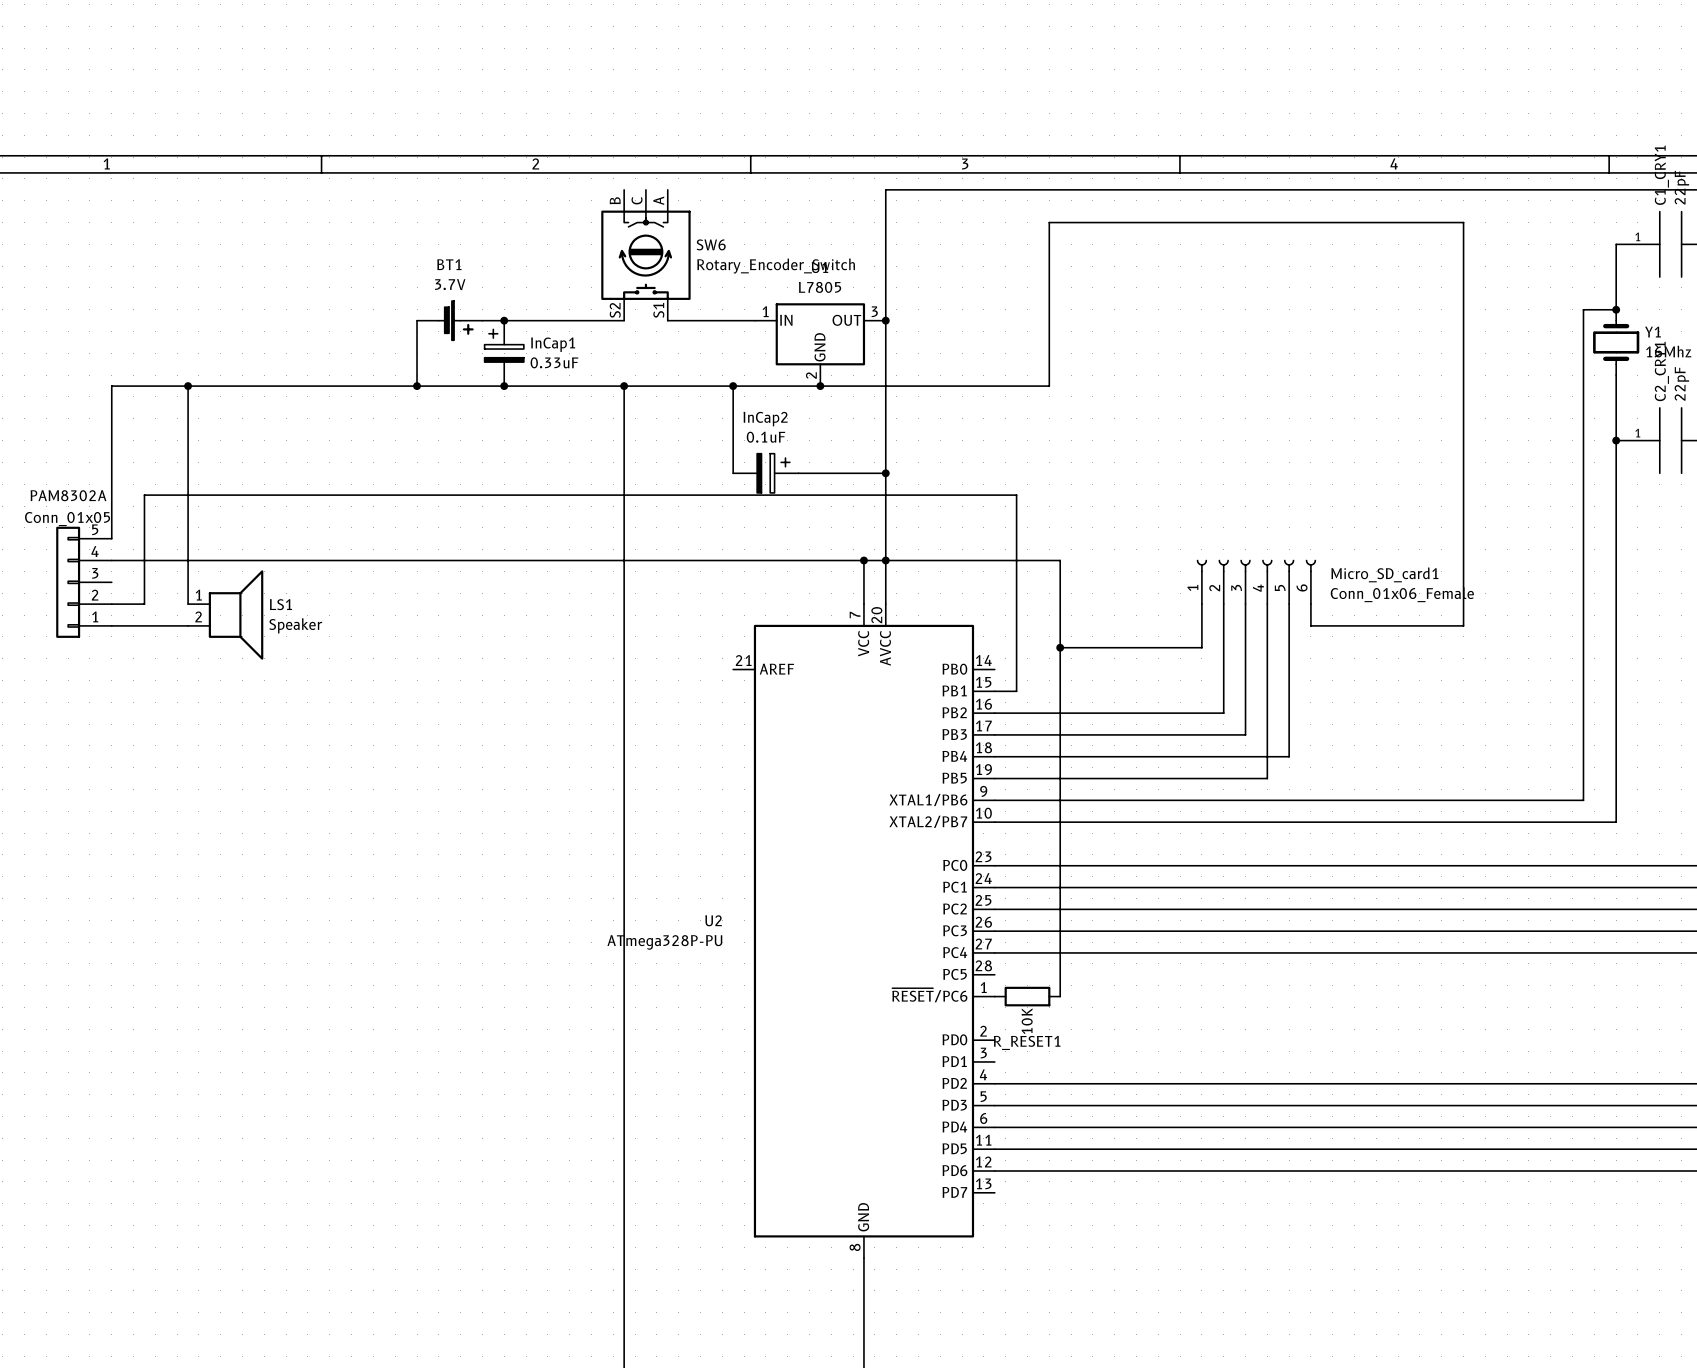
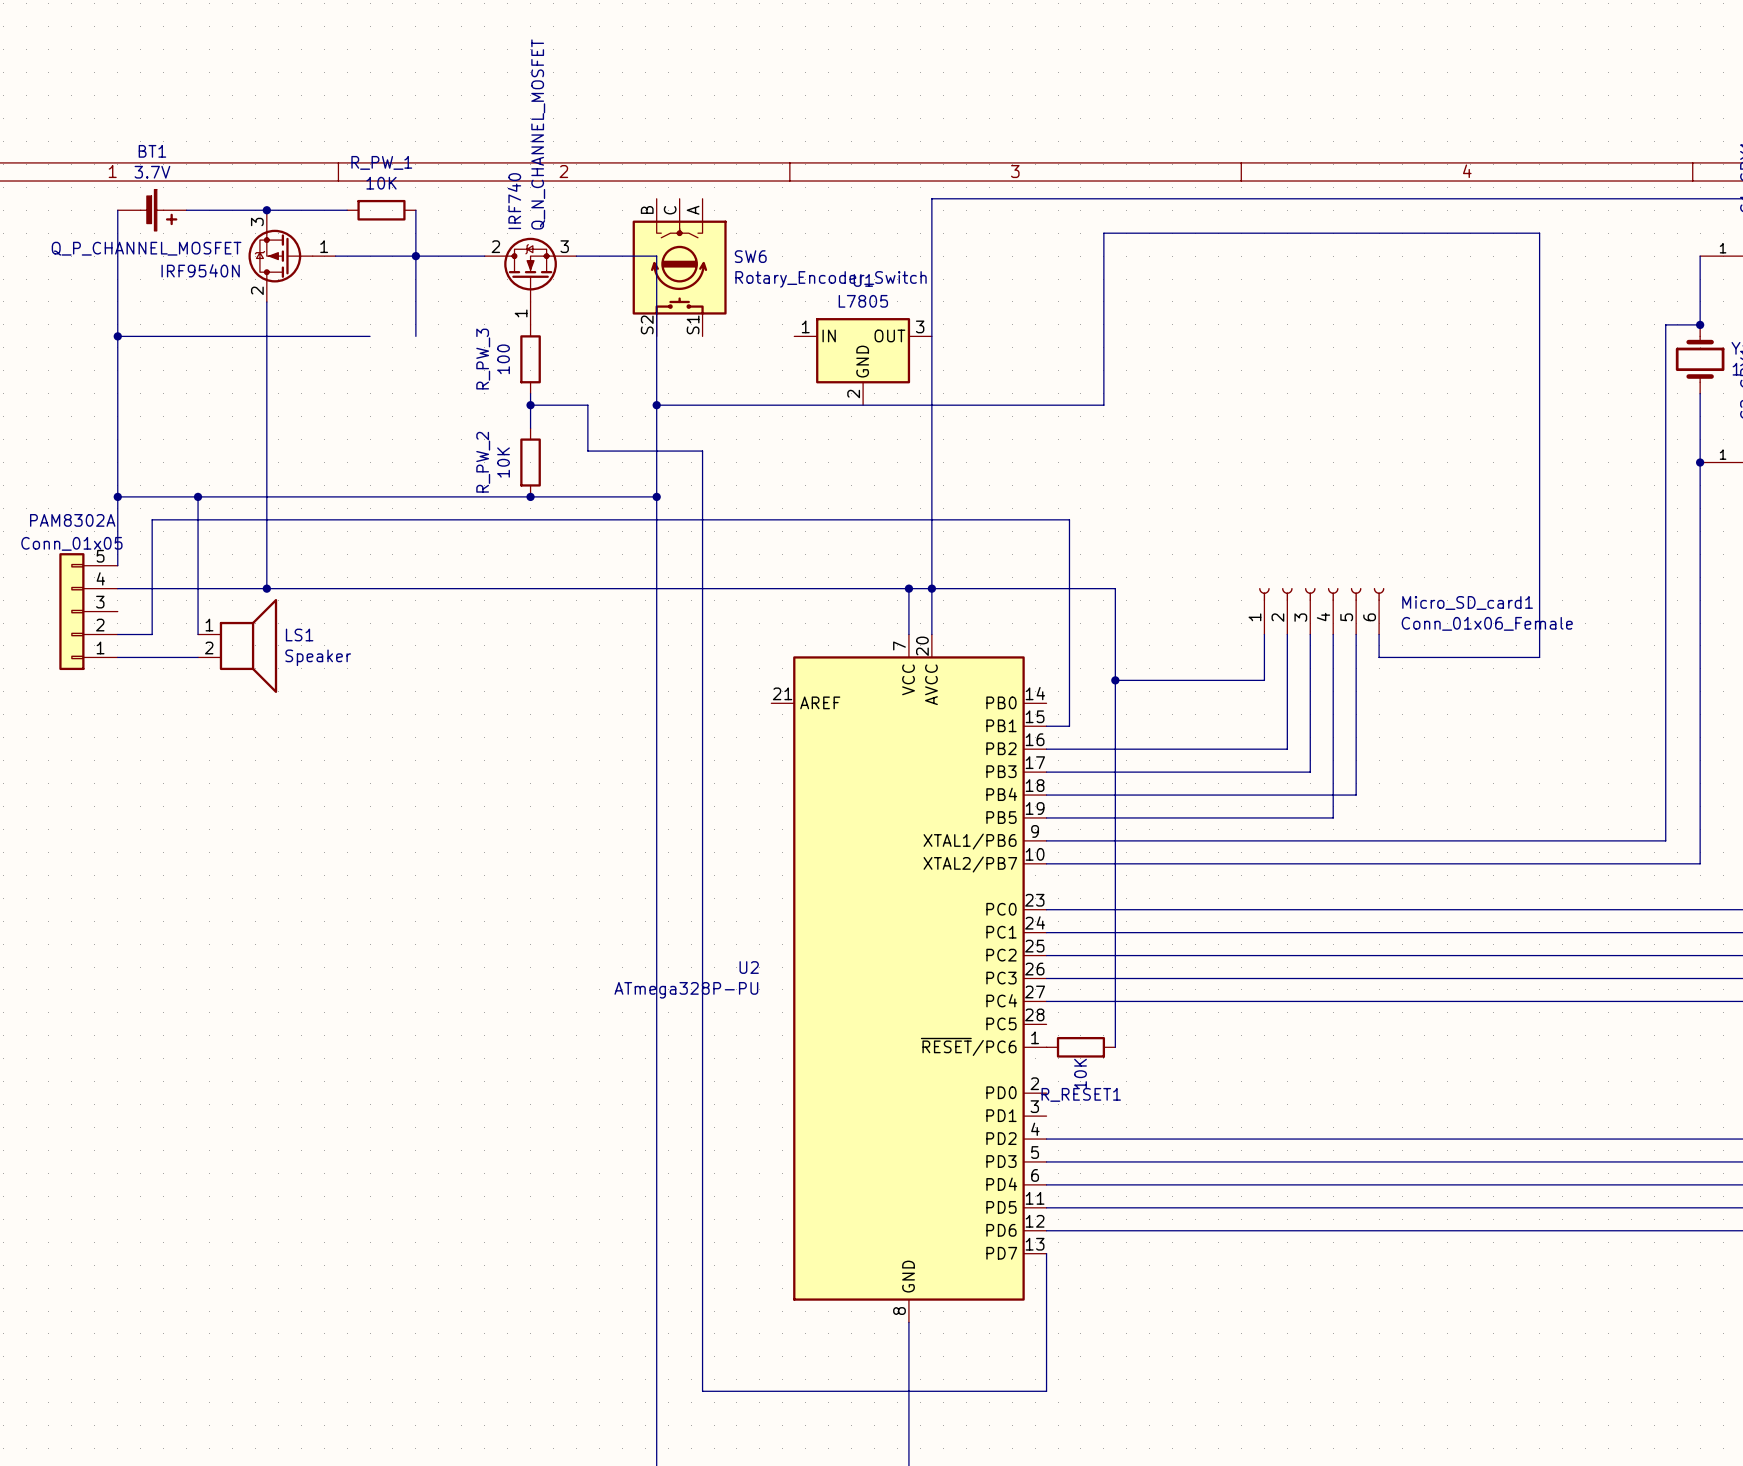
wire: none -> (186, 210) (347, 210)
junction: none -> (266, 210)
R_PW_1: none -> 10K (381, 210)
wire: none -> (415, 210) (415, 336)
Q_P_CHANNEL_MOSFET: none -> IRF9540N (292, 256)
junction: none -> (415, 256)
Q_N_CHANNEL_MOSFET: none -> IRF740 (530, 281)
wire: none -> (266, 301) (266, 588)
wire: none -> (117, 336) (370, 336)
junction: none -> (117, 336)
wire: (417, 320) (417, 386) -> none
BT1 position: (449, 320) -> (152, 210)
wire: (482, 320) (624, 320) -> (335, 256) (484, 256)
junction: (504, 320) -> none
wire: (667, 320) (754, 320) -> none
junction: (885, 320) -> none
R_PW_3: none -> 100 (530, 359)
InCap1: 0.33uF (504, 353) -> none
wire: none -> (530, 393) (530, 428)
wire: (111, 386) (504, 386) -> (117, 405) (117, 210)
wire: (188, 386) (188, 473) -> none
junction: (188, 386) -> none
junction: (417, 386) -> none
wire: (558, 386) (624, 386) -> (576, 256) (656, 256) (656, 405)
wire: none -> (587, 405) (587, 451) (702, 451) (702, 1391) (1046, 1391) (1046, 1253)
wire: (733, 386) (733, 473) -> none
junction: (733, 386) -> none
junction: (820, 386) -> none
R_PW_2: none -> 10K (530, 462)
wire: none -> (117, 496) (656, 496)
junction: none -> (117, 496)
junction: none -> (198, 496)
junction: none -> (530, 496)
junction: none -> (656, 496)
InCap2: 0.1uF (765, 473) -> none
wire: (798, 473) (885, 473) -> none
junction: (885, 473) -> none
junction: none -> (266, 588)

